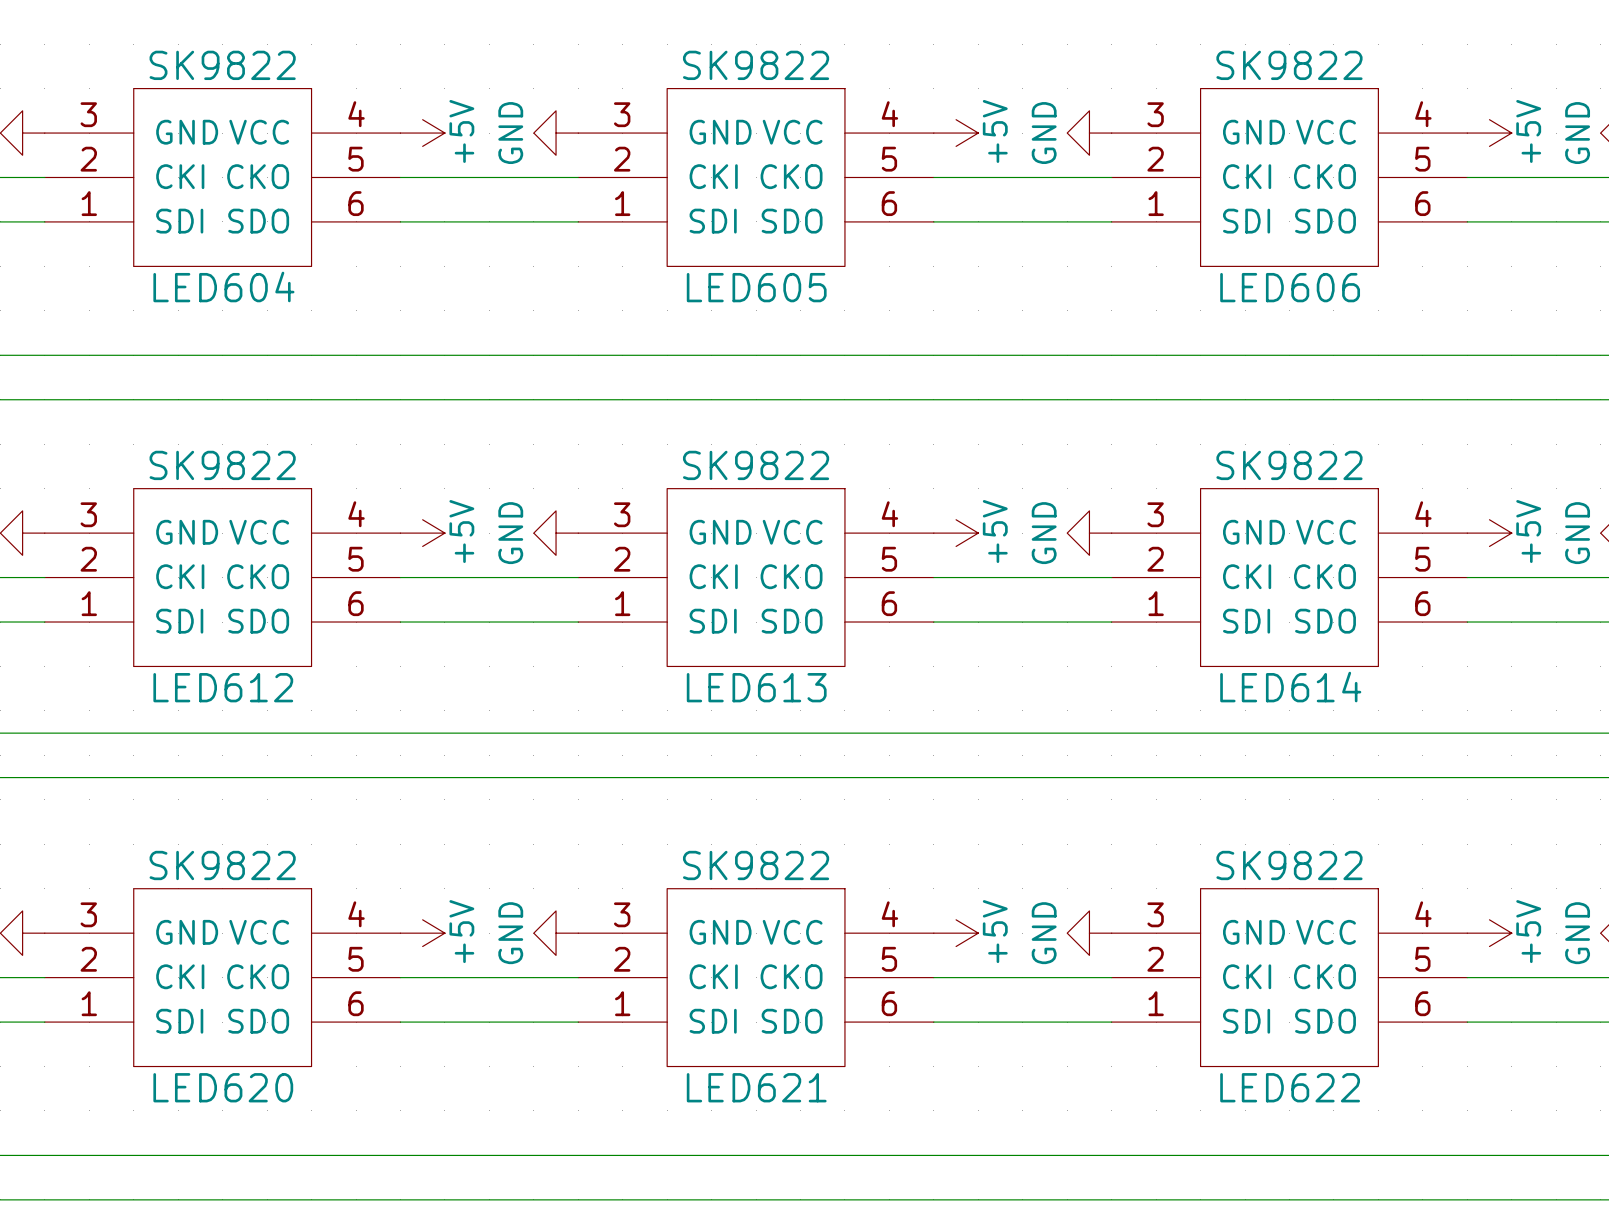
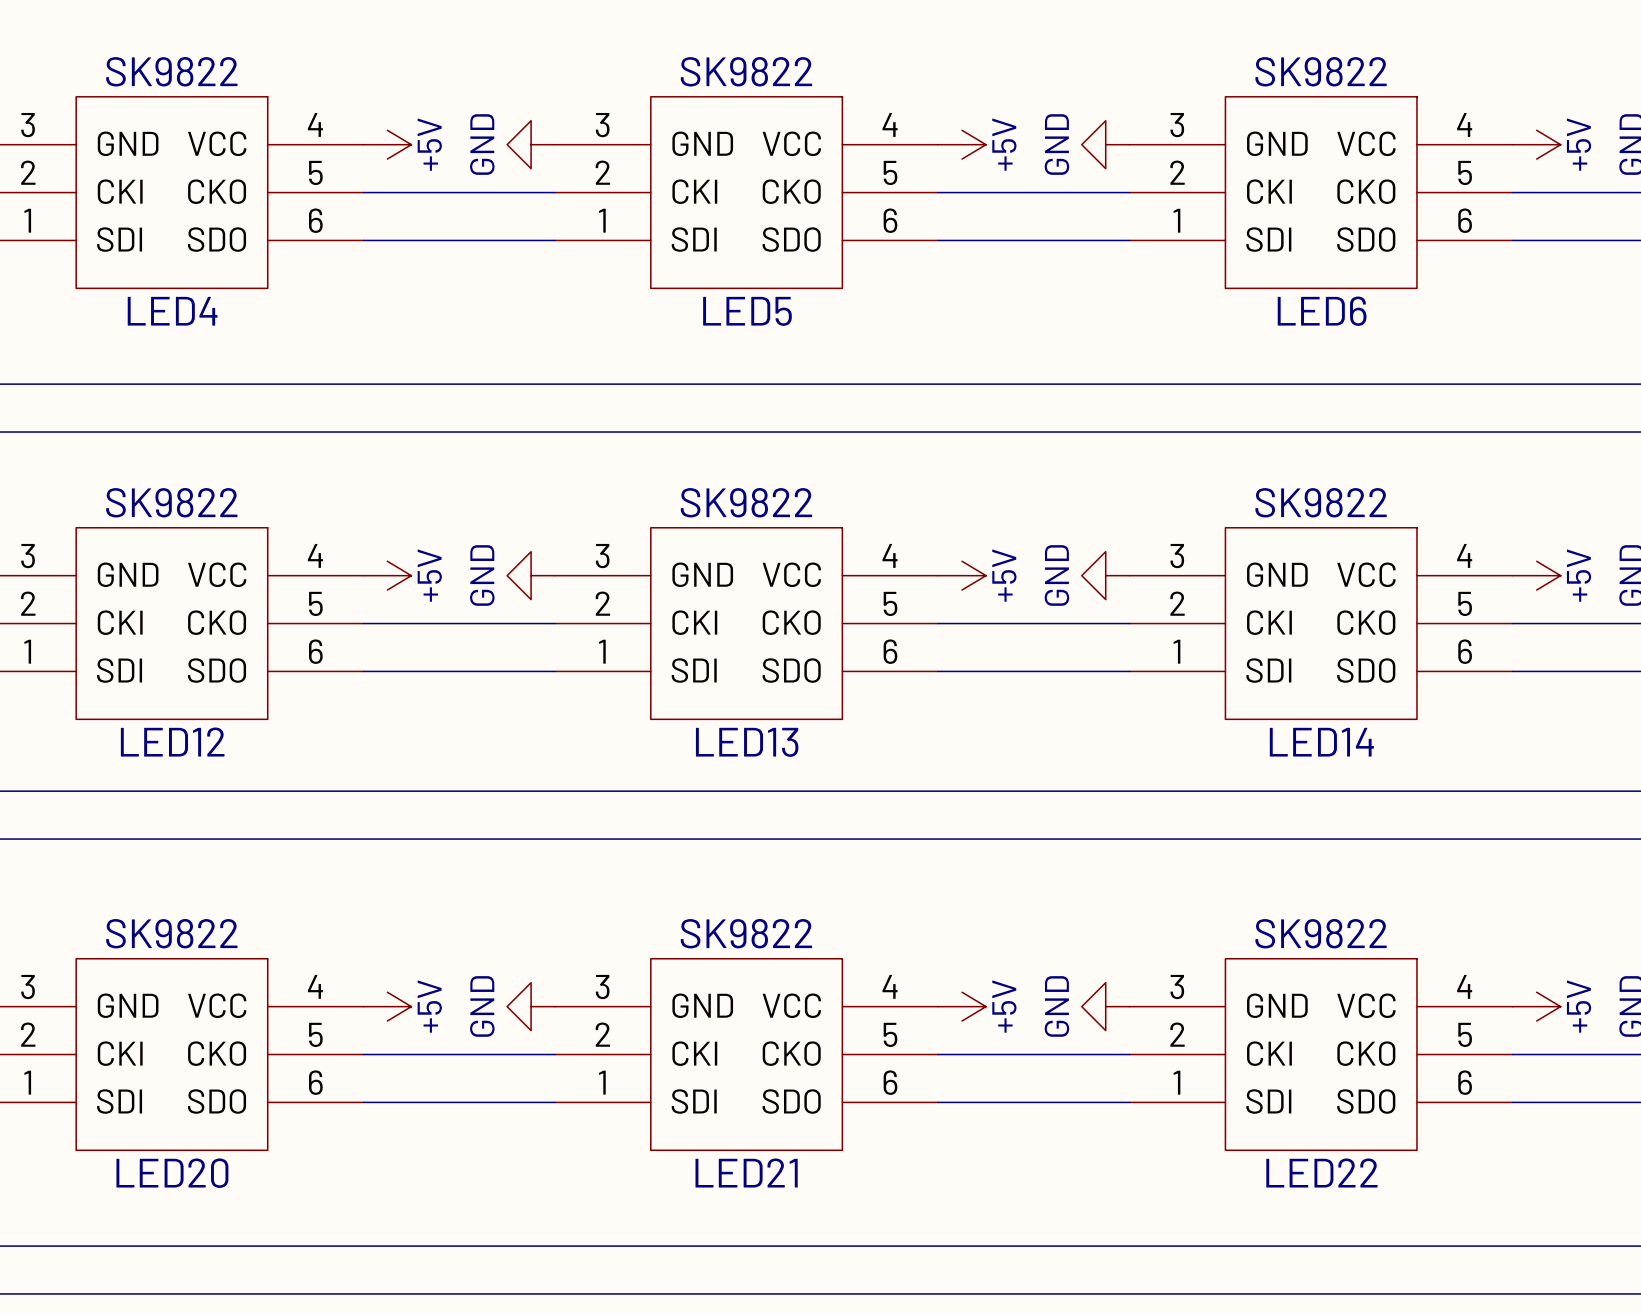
LED604 name: LED604 (223, 286) -> LED4 (172, 311)
LED605 name: LED605 (756, 287) -> LED5 (747, 311)
LED606 name: LED606 (1290, 287) -> LED6 (1322, 311)
LED612 name: LED612 (223, 687) -> LED12 (172, 742)
LED613 name: LED613 (756, 687) -> LED13 (747, 742)
LED614 name: LED614 (1290, 687) -> LED14 (1321, 742)
LED620 name: LED620 (223, 1087) -> LED20 (172, 1173)
LED621 name: LED621 (756, 1087) -> LED21 (746, 1173)
LED622 name: LED622 (1290, 1087) -> LED22 (1321, 1173)

